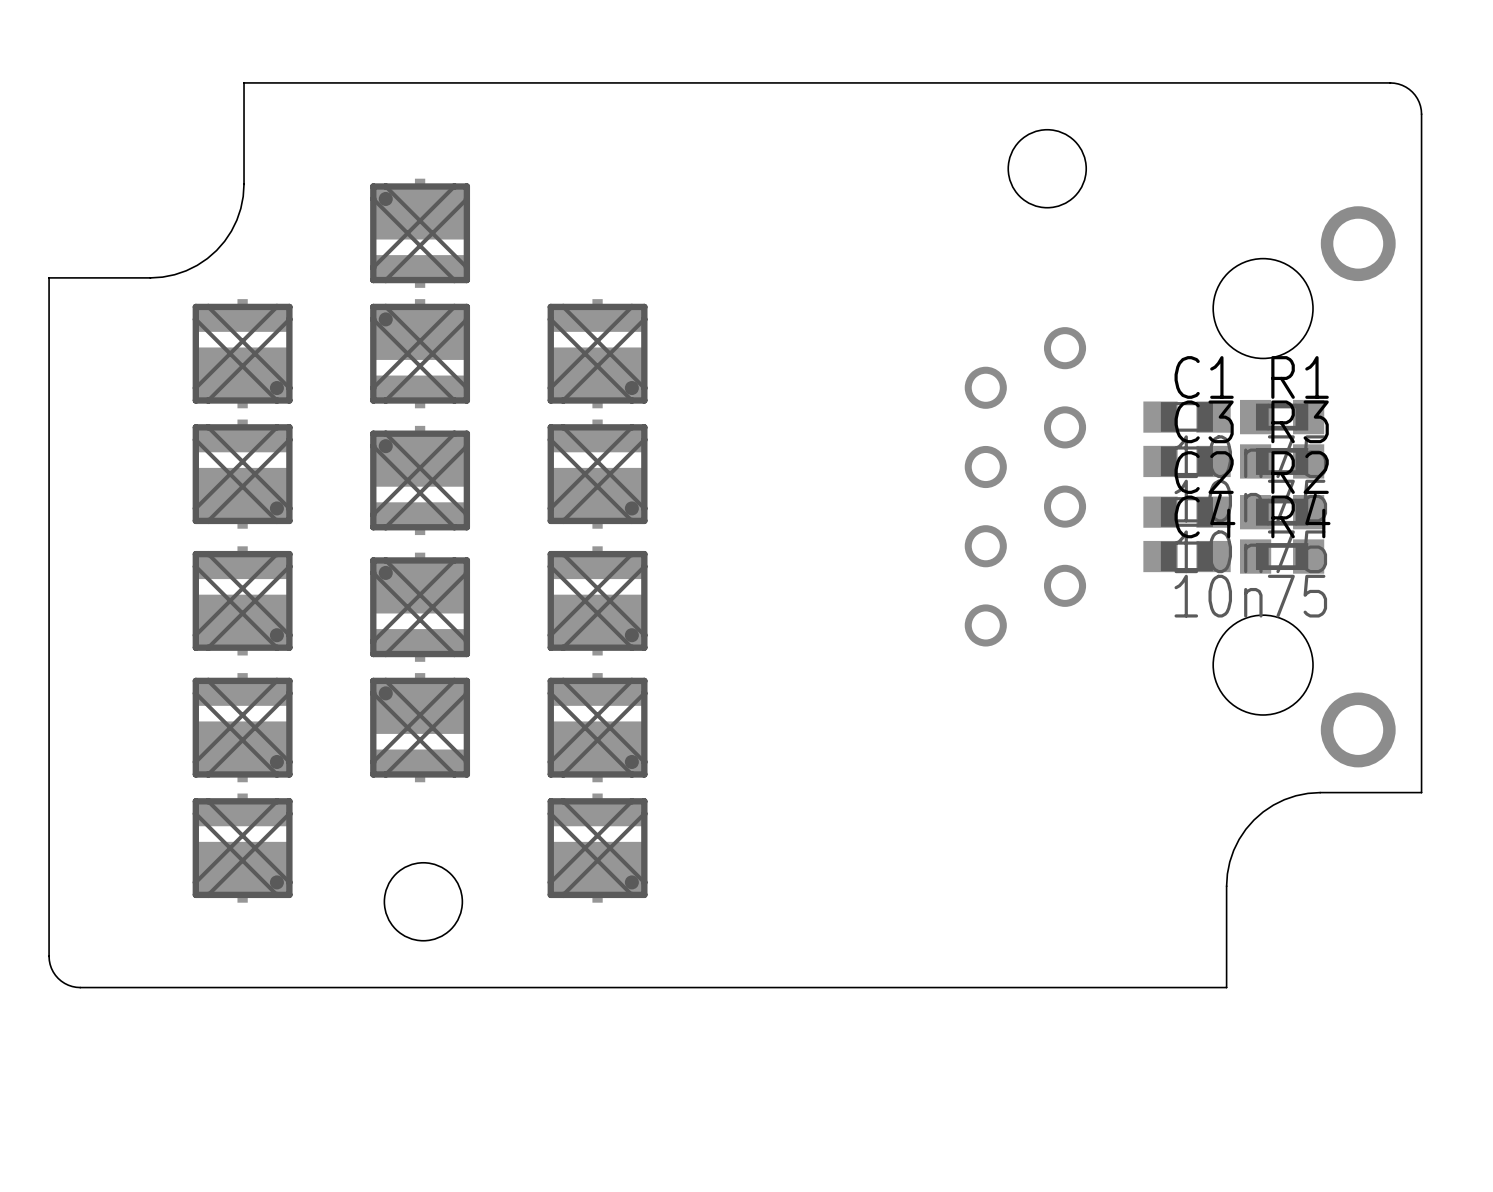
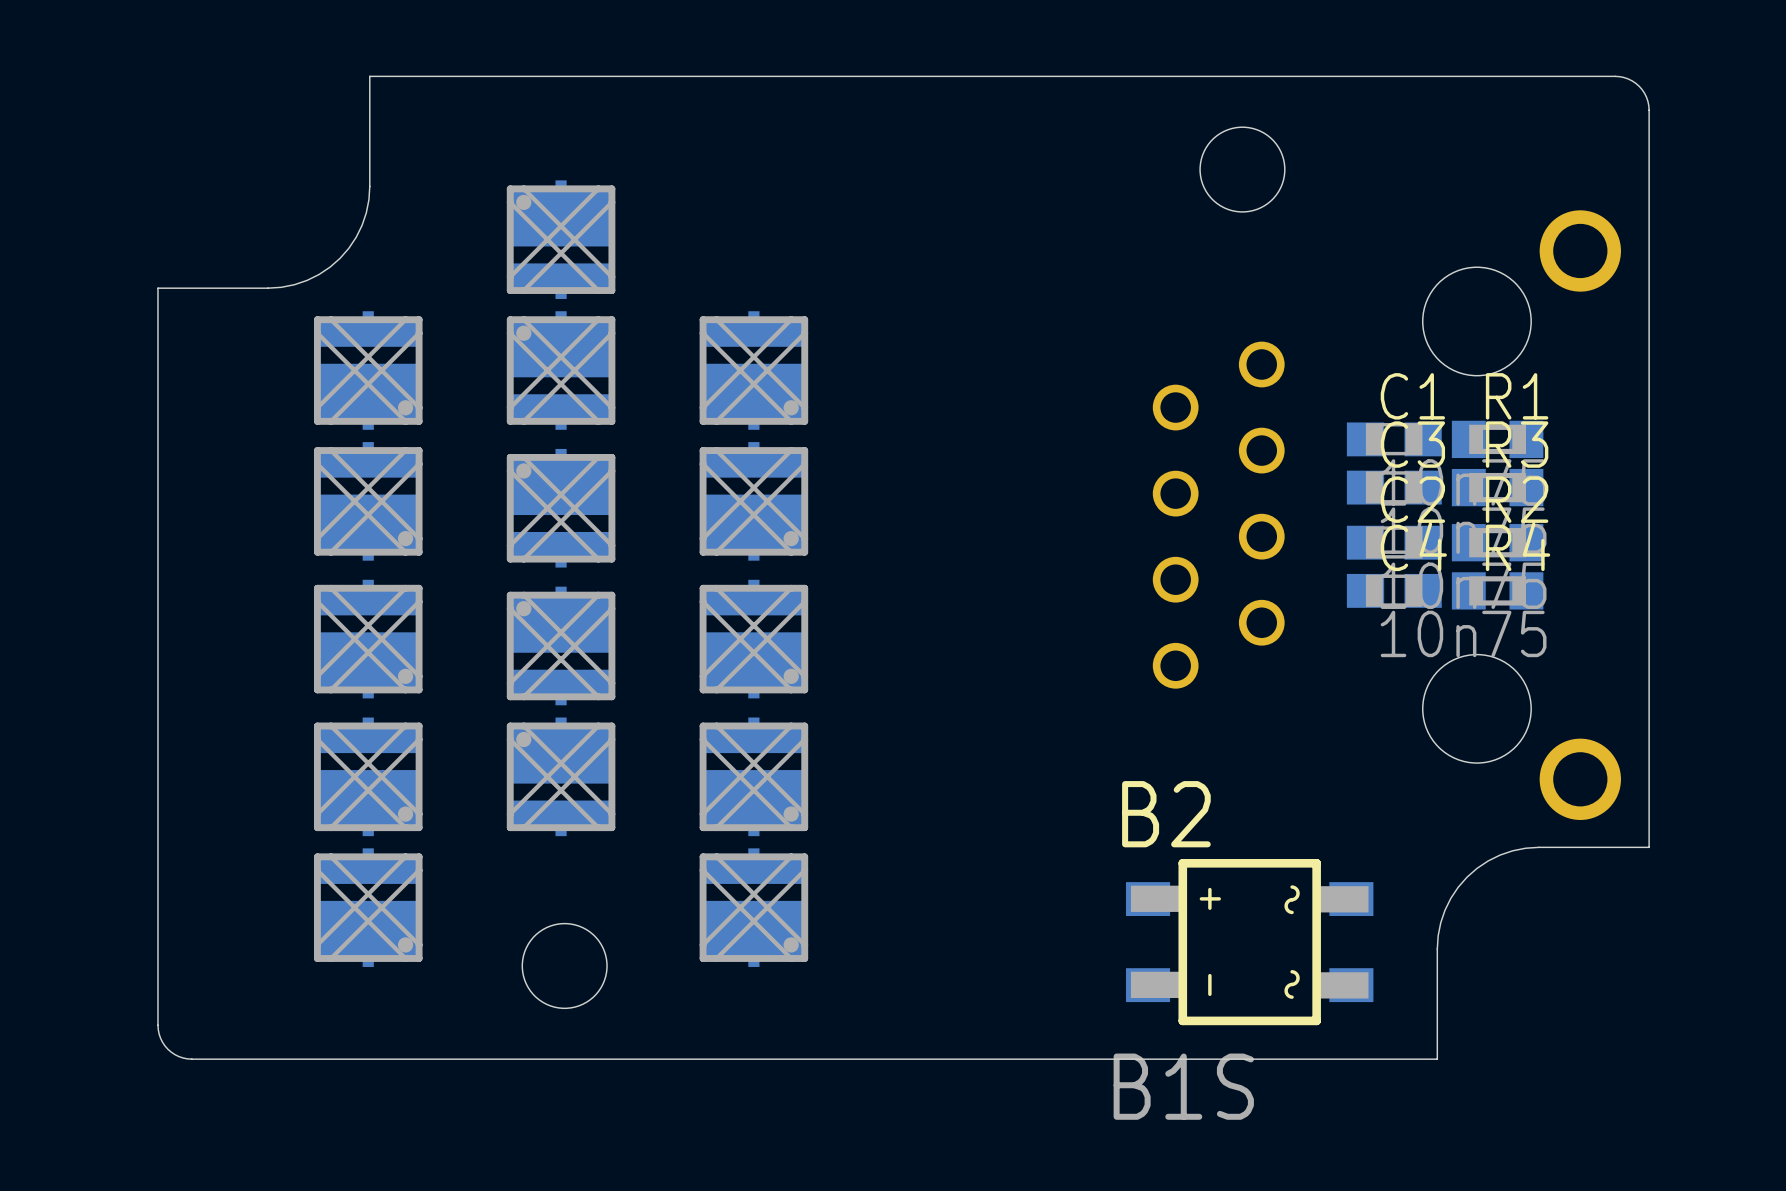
B2: none -> B1S (1249, 942)

